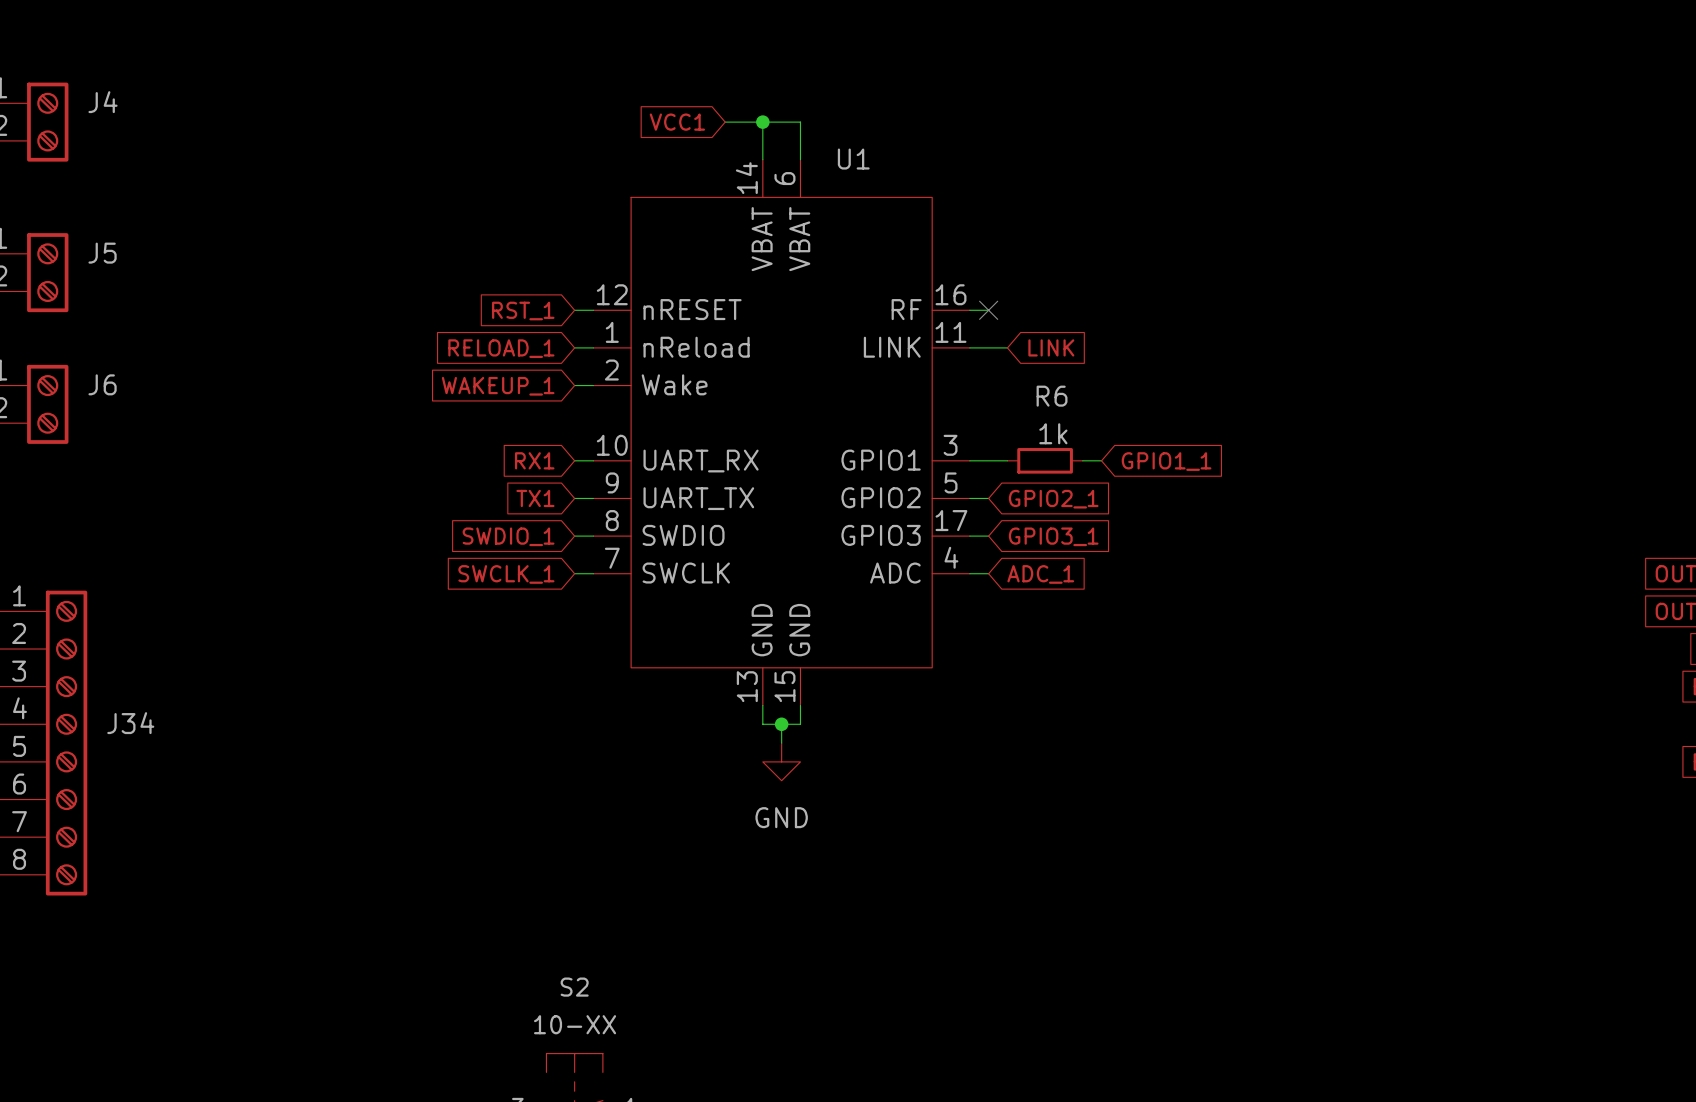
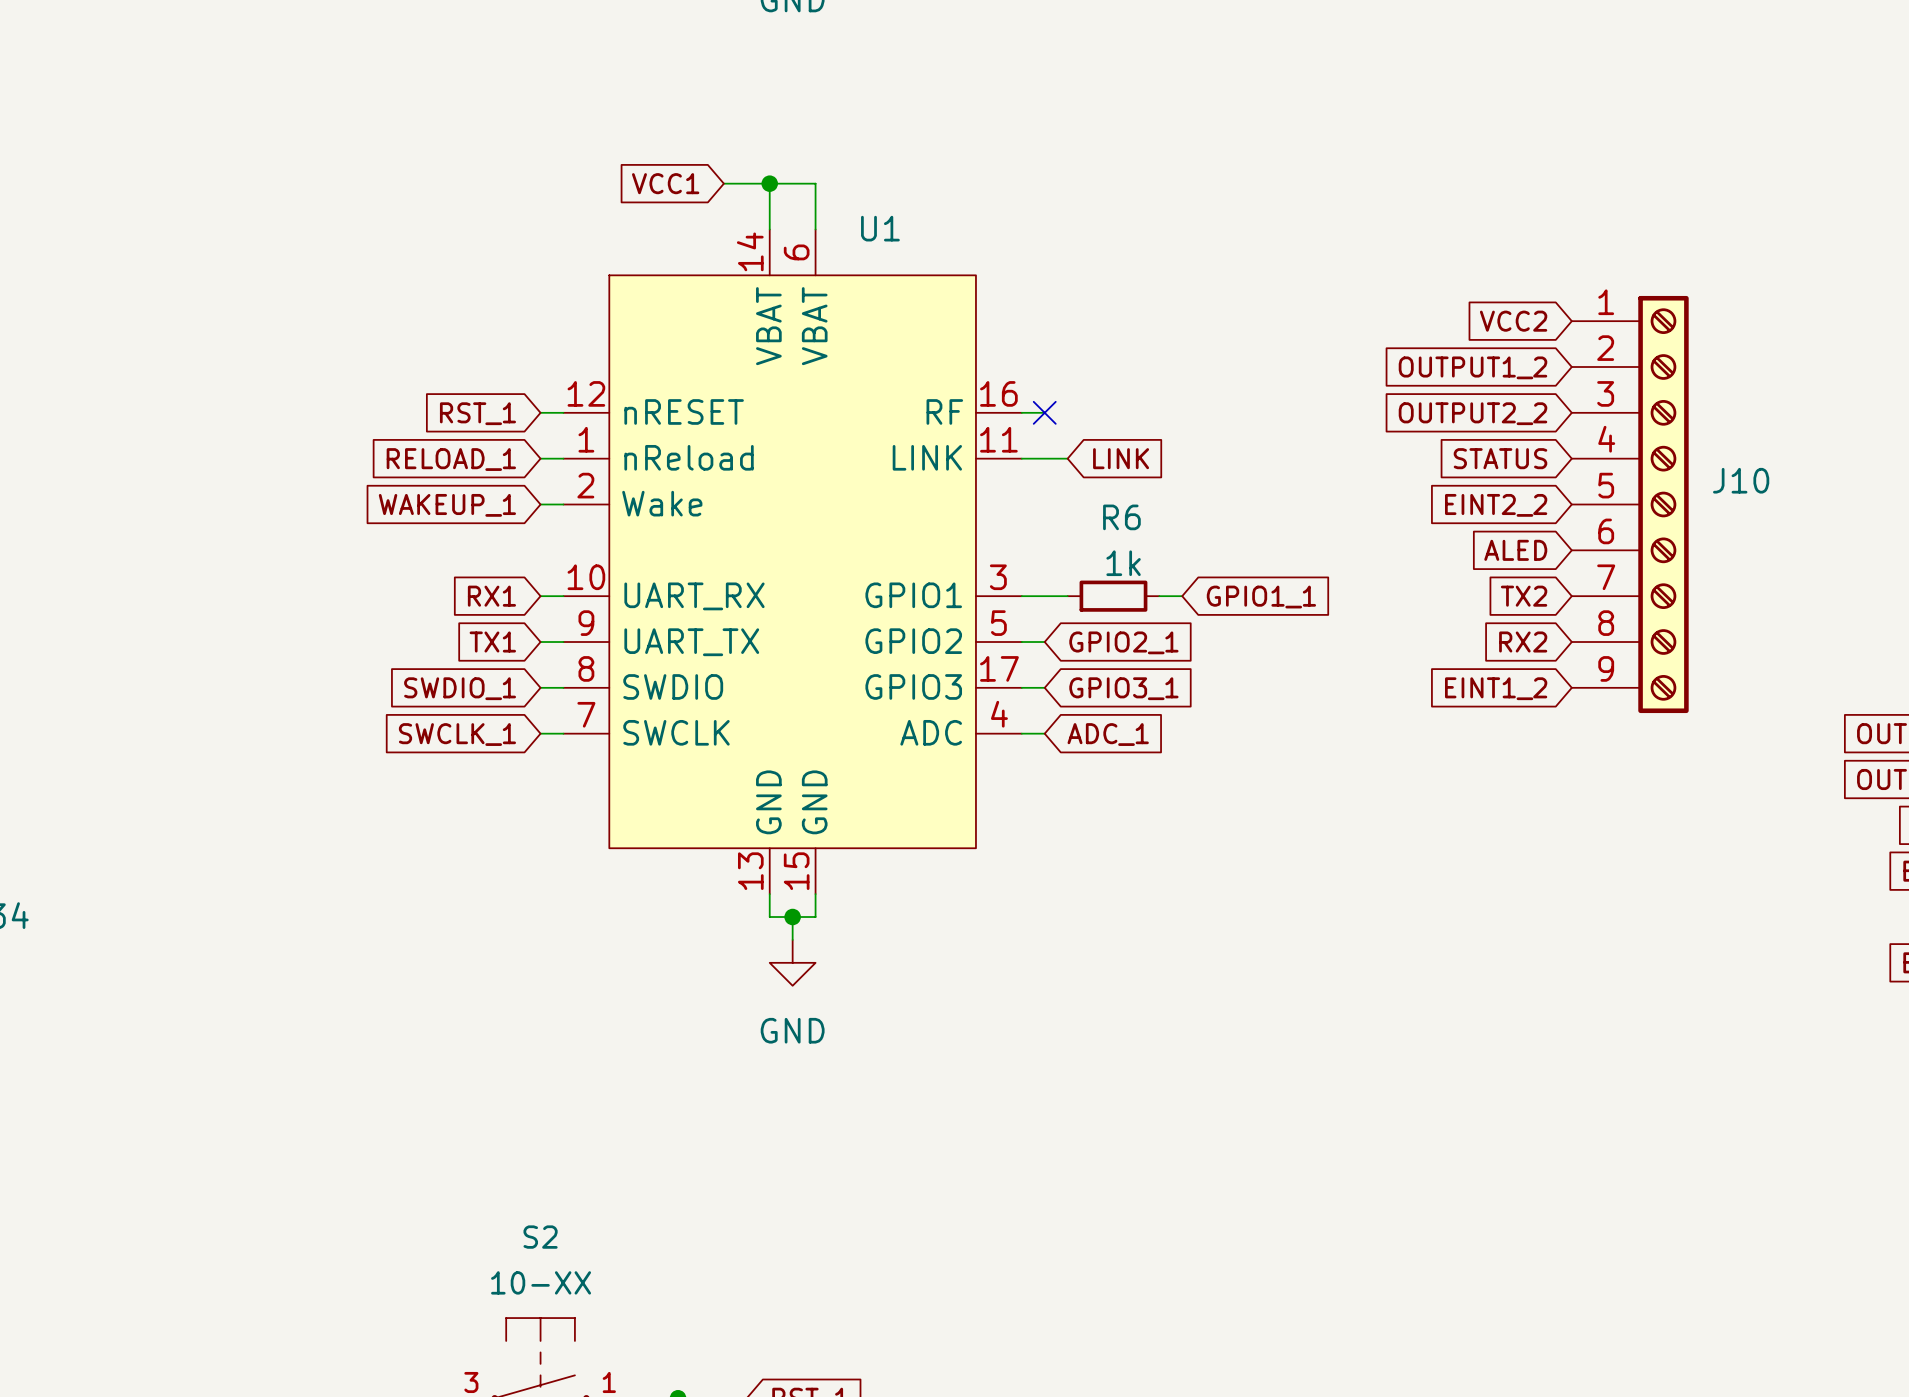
global label: none -> VCC2 (1513, 321)
global label: none -> OUTPUT1_2 (1472, 367)
global label: none -> OUTPUT2_2 (1472, 413)
global label: none -> STATUS (1500, 458)
J10: none -> (1630, 504)
global label: none -> EINT2_2 (1496, 505)
global label: none -> ALED (1515, 550)
global label: none -> TX2 (1524, 596)
global label: none -> RX2 (1523, 642)
global label: none -> EINT1_2 (1496, 688)

